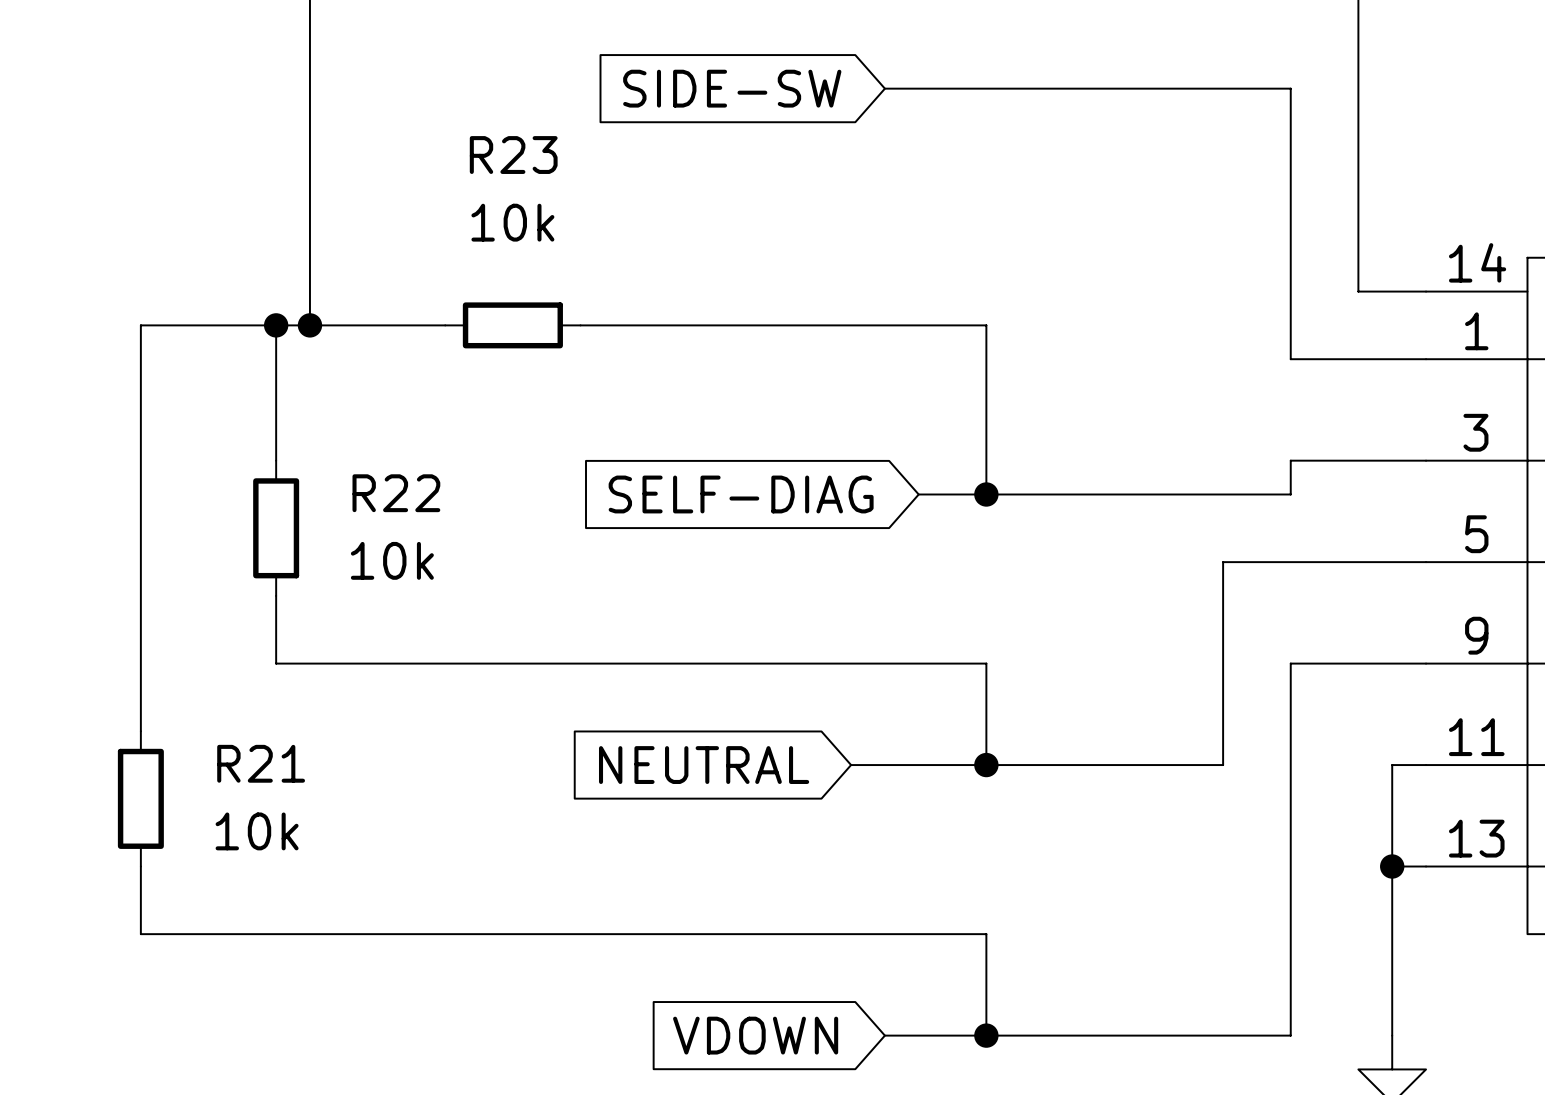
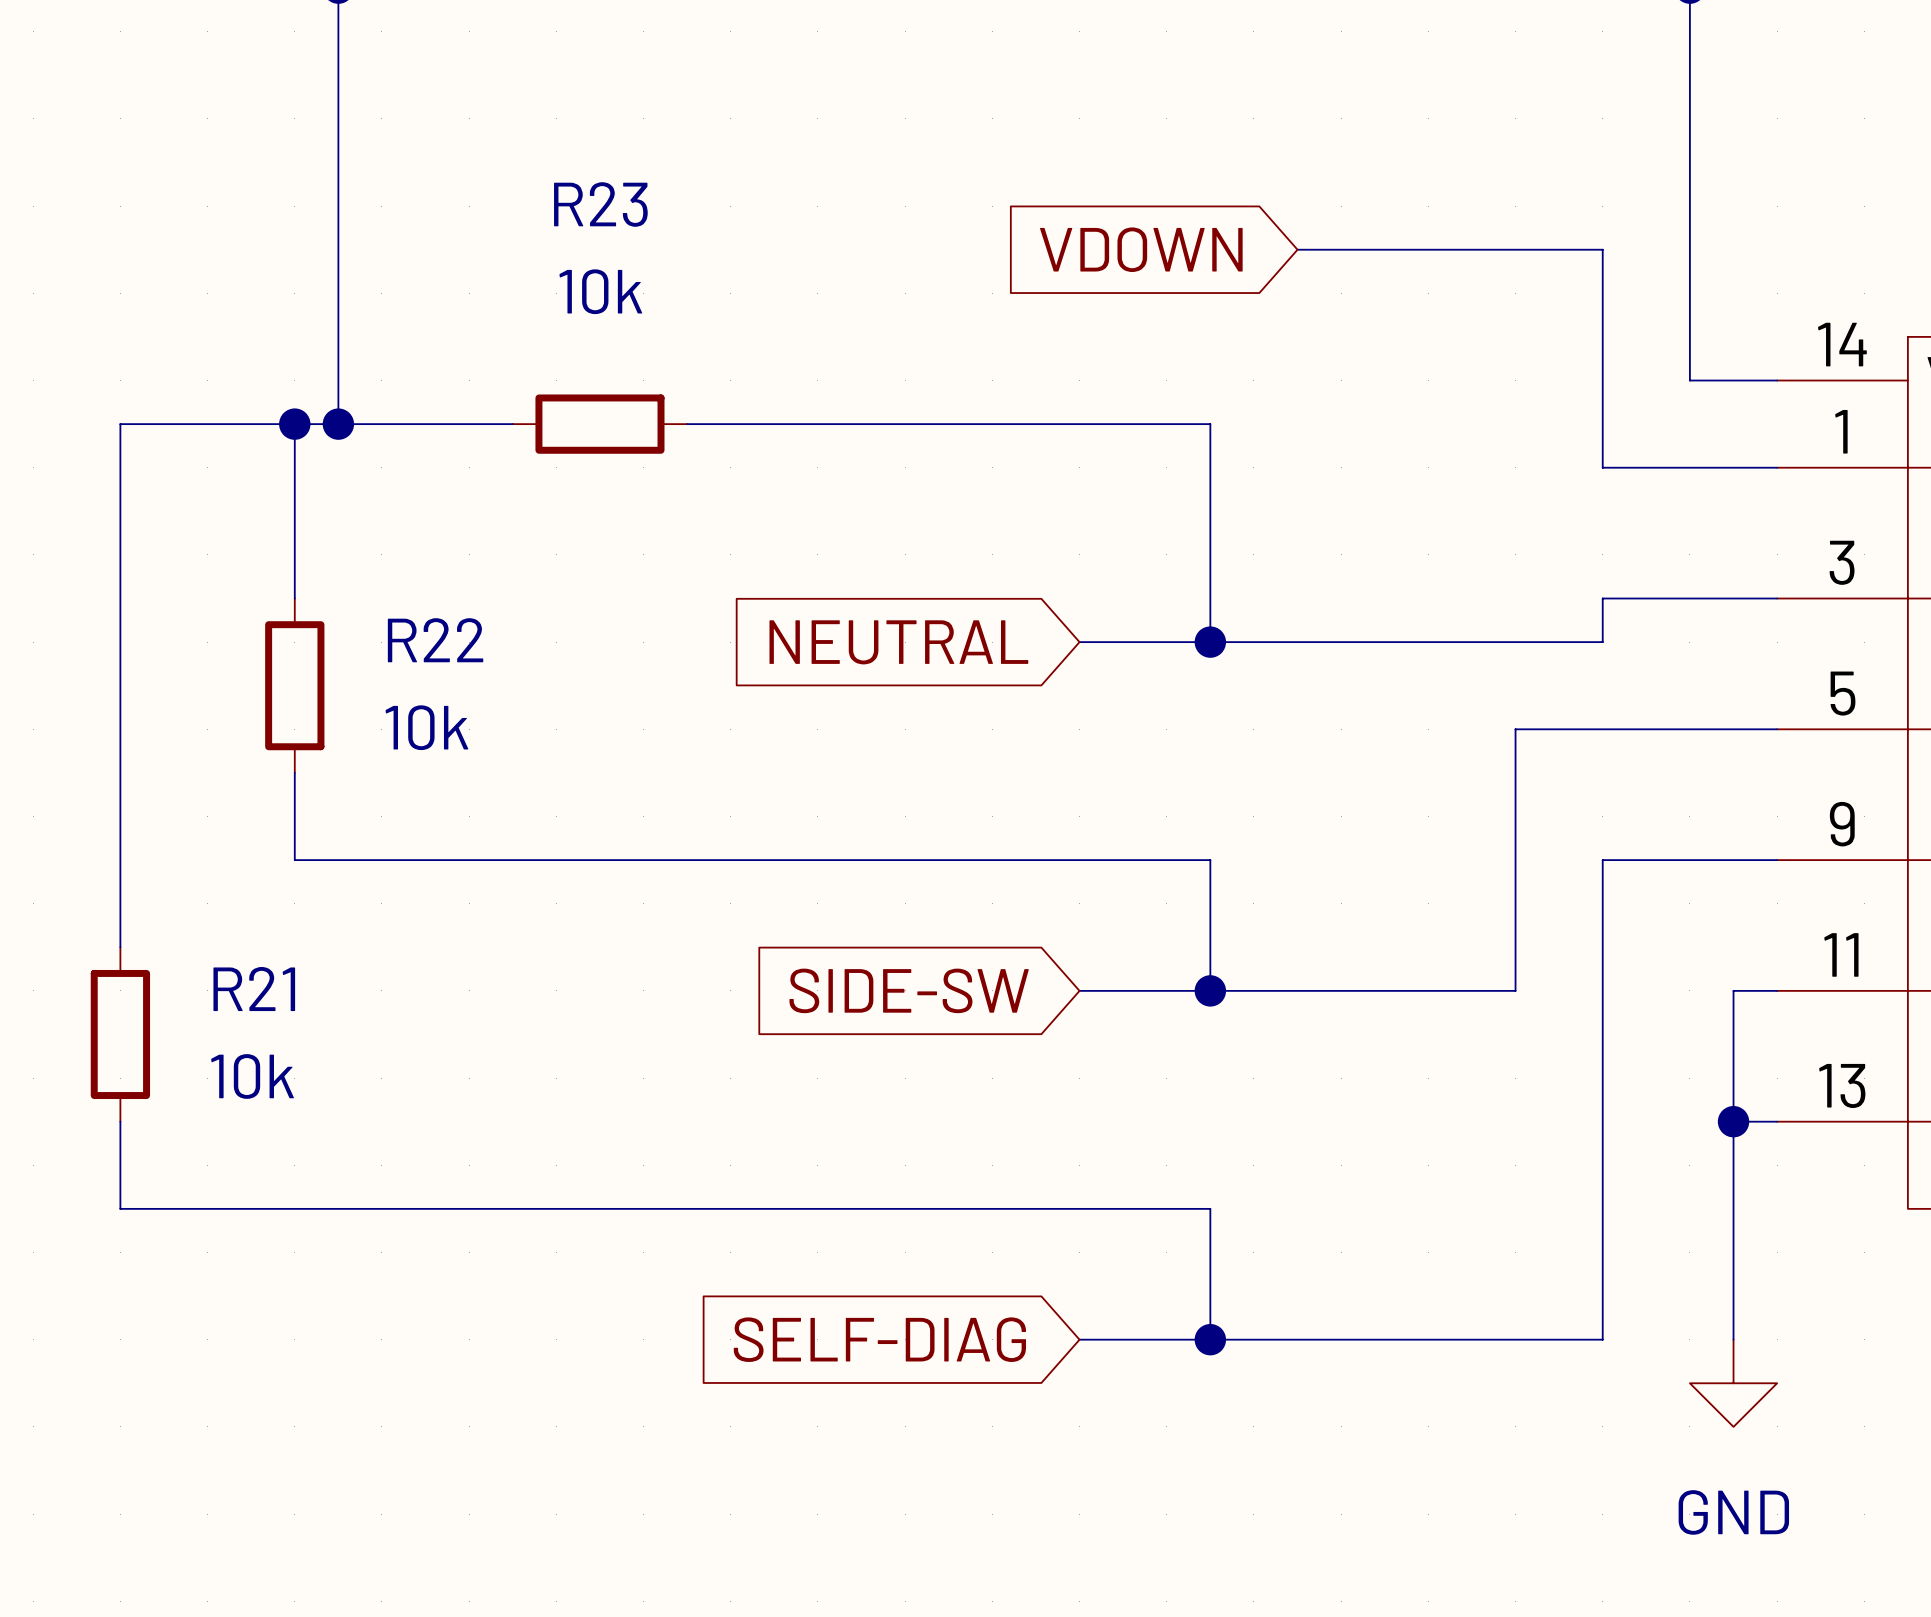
global label: SIDE-SW (732, 88) -> none
wire: (884, 88) (1290, 88) (1290, 190) -> (1297, 249) (1602, 249)
global label: none -> VDOWN (1141, 249)
global label: SELF-DIAG (741, 494) -> none
global label position: NEUTRAL (704, 765) -> NEUTRAL (898, 642)
global label: none -> SIDE-SW (909, 990)
wire: (851, 765) (884, 765) -> (1079, 642) (1123, 642)
global label: VDOWN (755, 1035) -> SELF-DIAG (879, 1339)

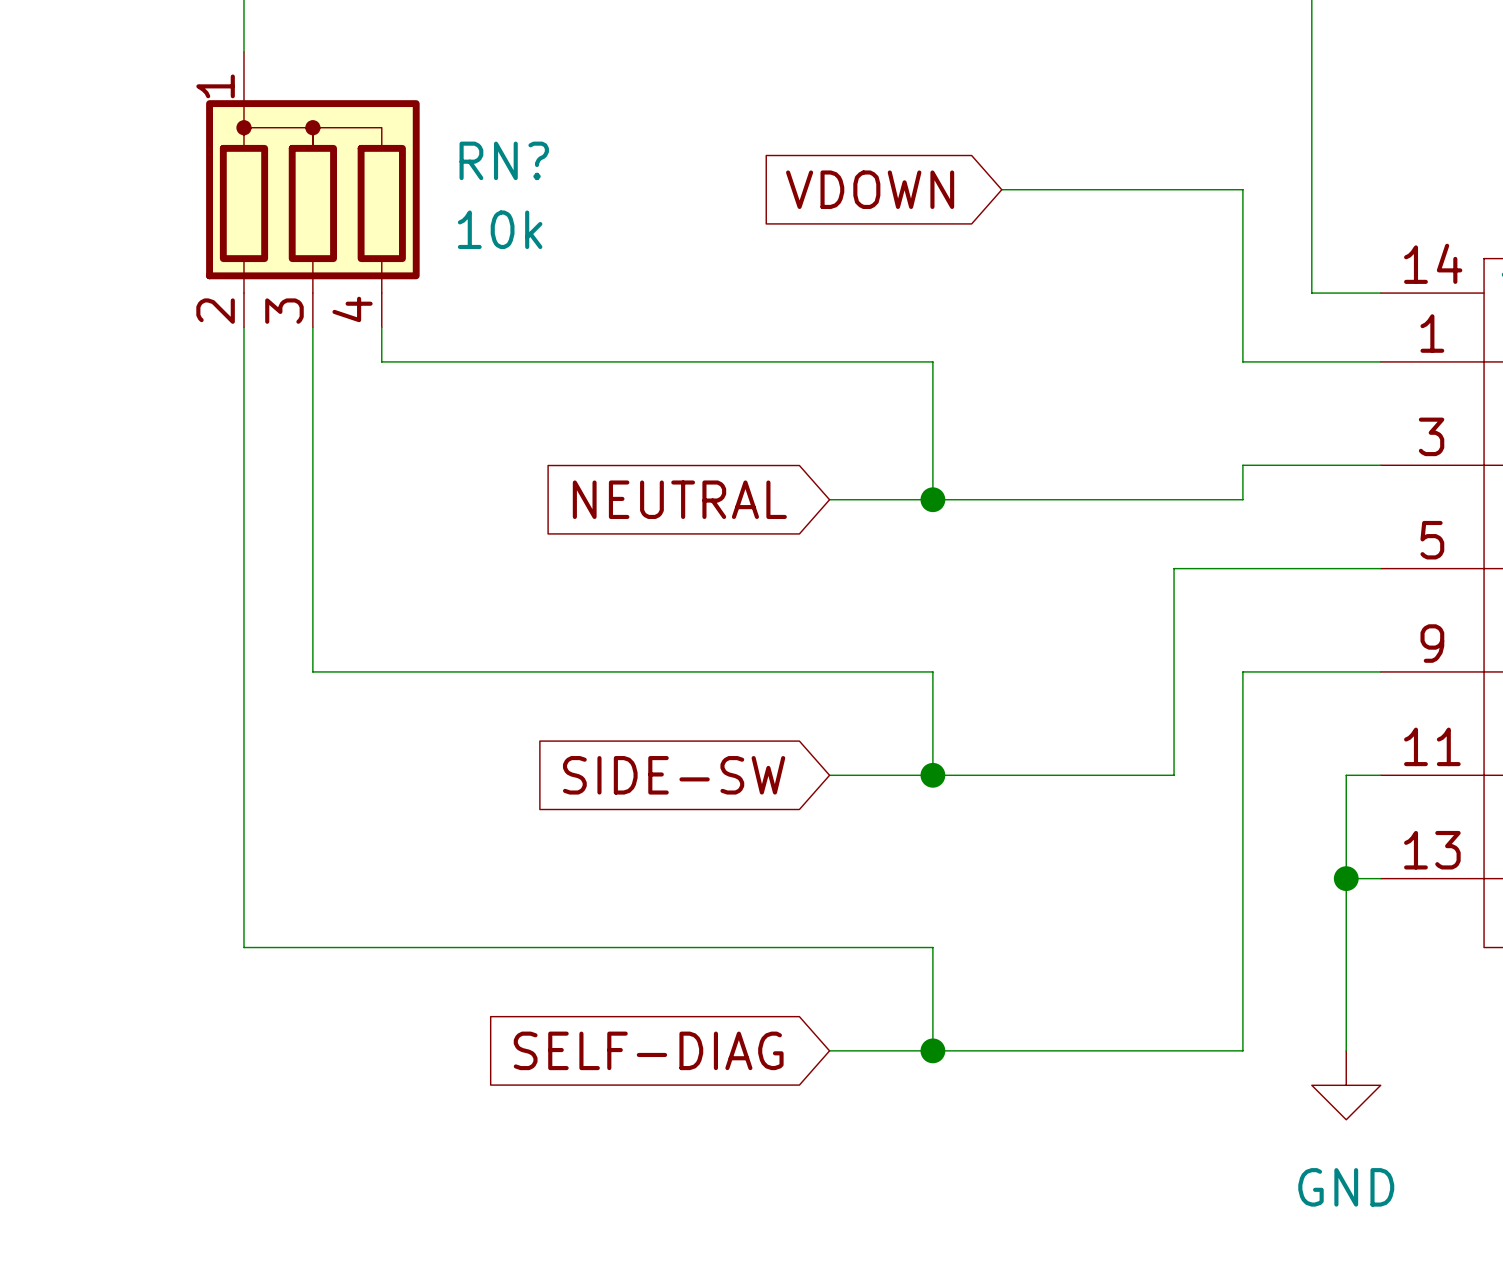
RN?: none -> 10k (312, 189)
wire: (294, 424) (294, 598) -> none
junction: (294, 424) -> none
junction: (338, 424) -> none
wire: (512, 424) (120, 424) (120, 947) -> none
R23: 10k (599, 424) -> none
wire: (687, 424) (1210, 424) (1210, 467) -> (381, 327) (381, 361) (932, 361)
R22: 10k (294, 685) -> none
wire: (294, 772) (294, 860) (425, 860) -> (312, 327) (312, 671)
R21: 10k (120, 1034) -> none
wire: (120, 1121) (120, 1208) (338, 1208) -> (243, 327) (243, 947)

